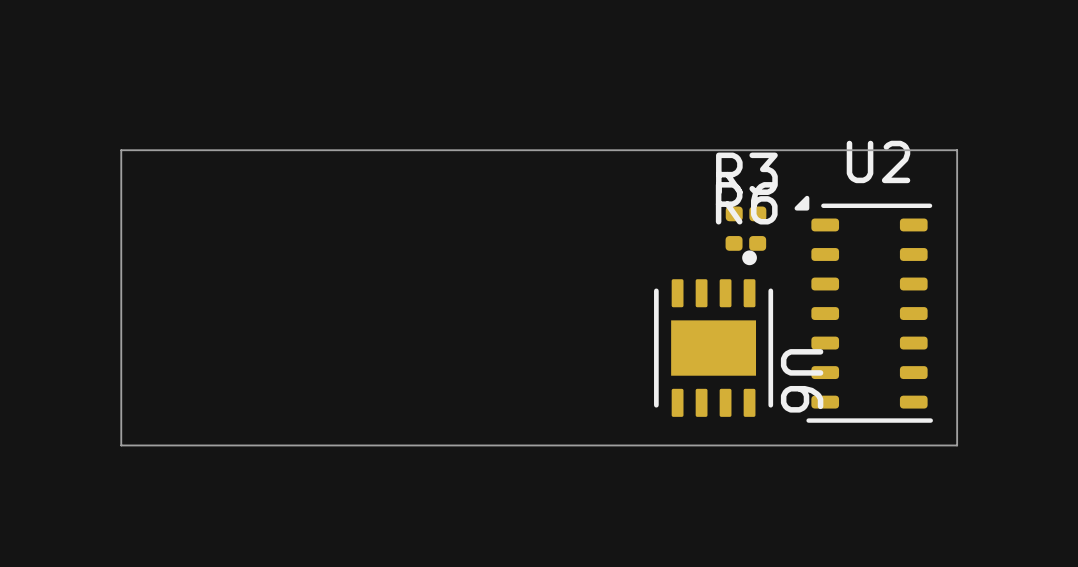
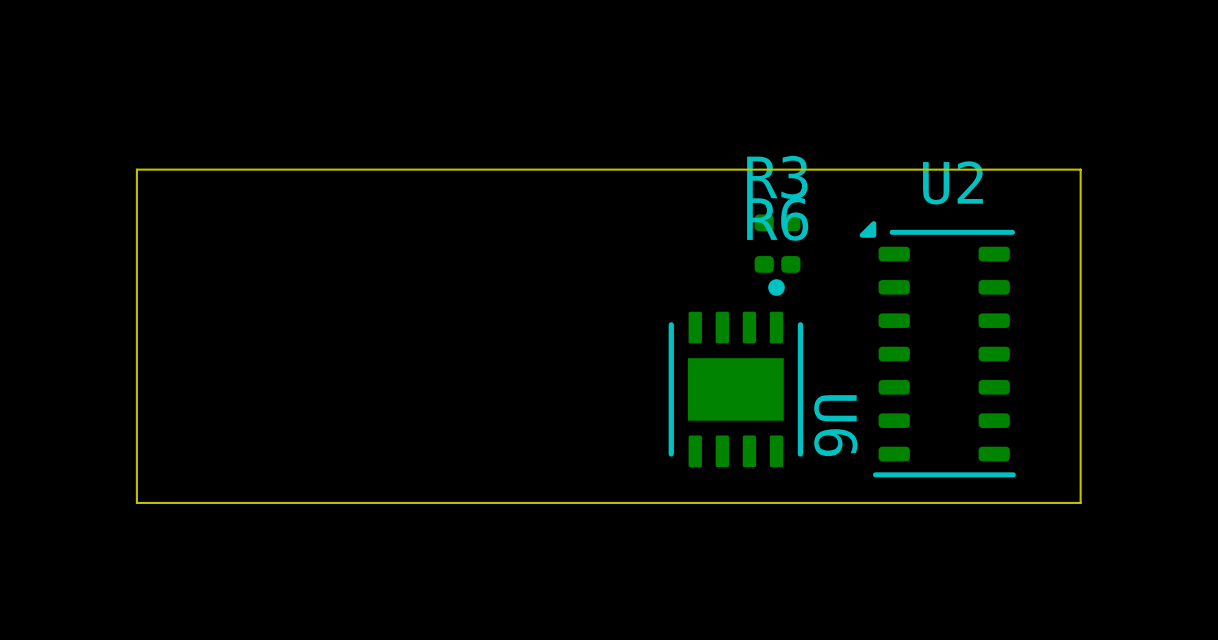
R3 position: (746, 213) -> (777, 222)
R6 position: (745, 243) -> (777, 264)
U2 position: (863, 309) -> (937, 349)
U6 position: (713, 333) -> (735, 373)

